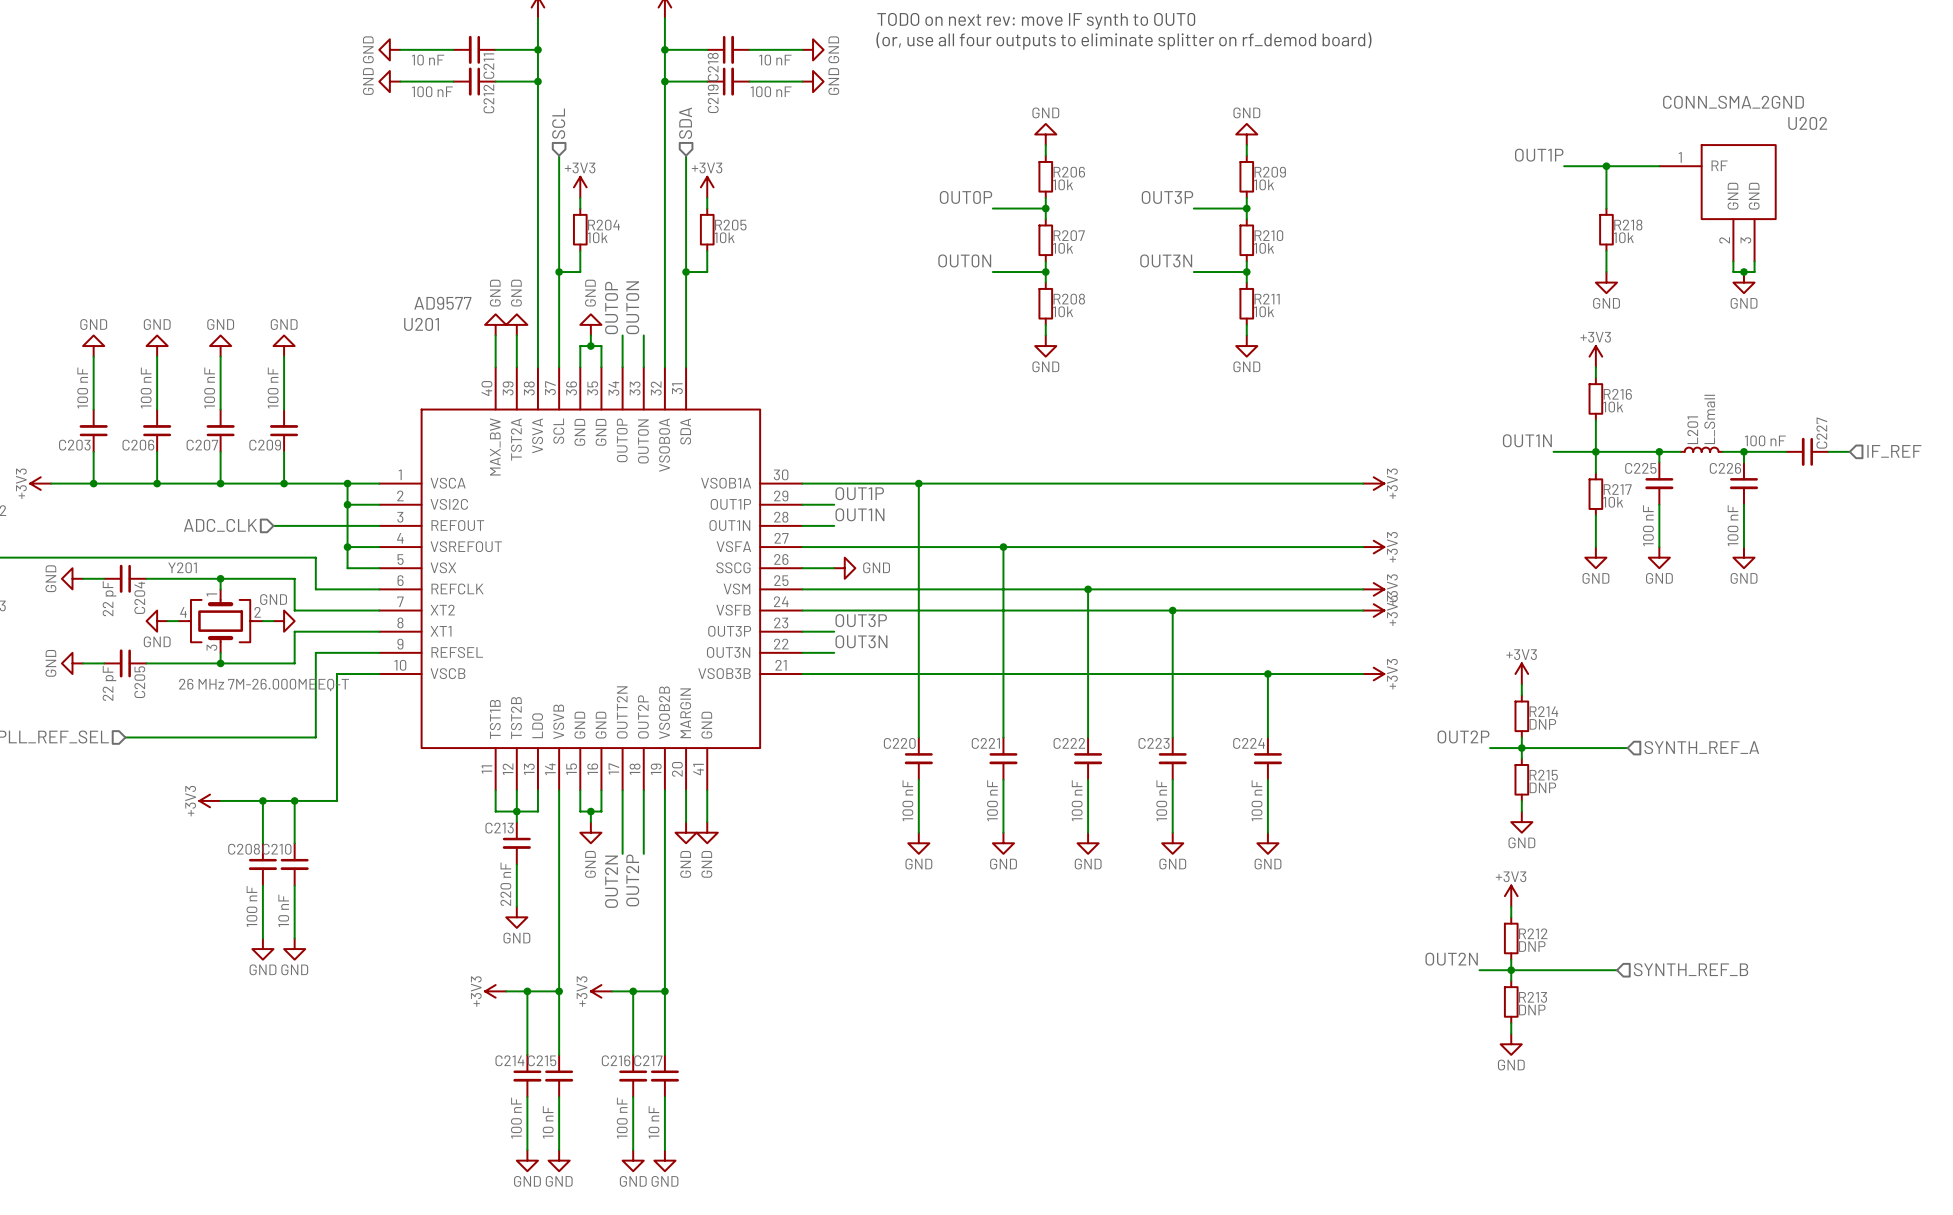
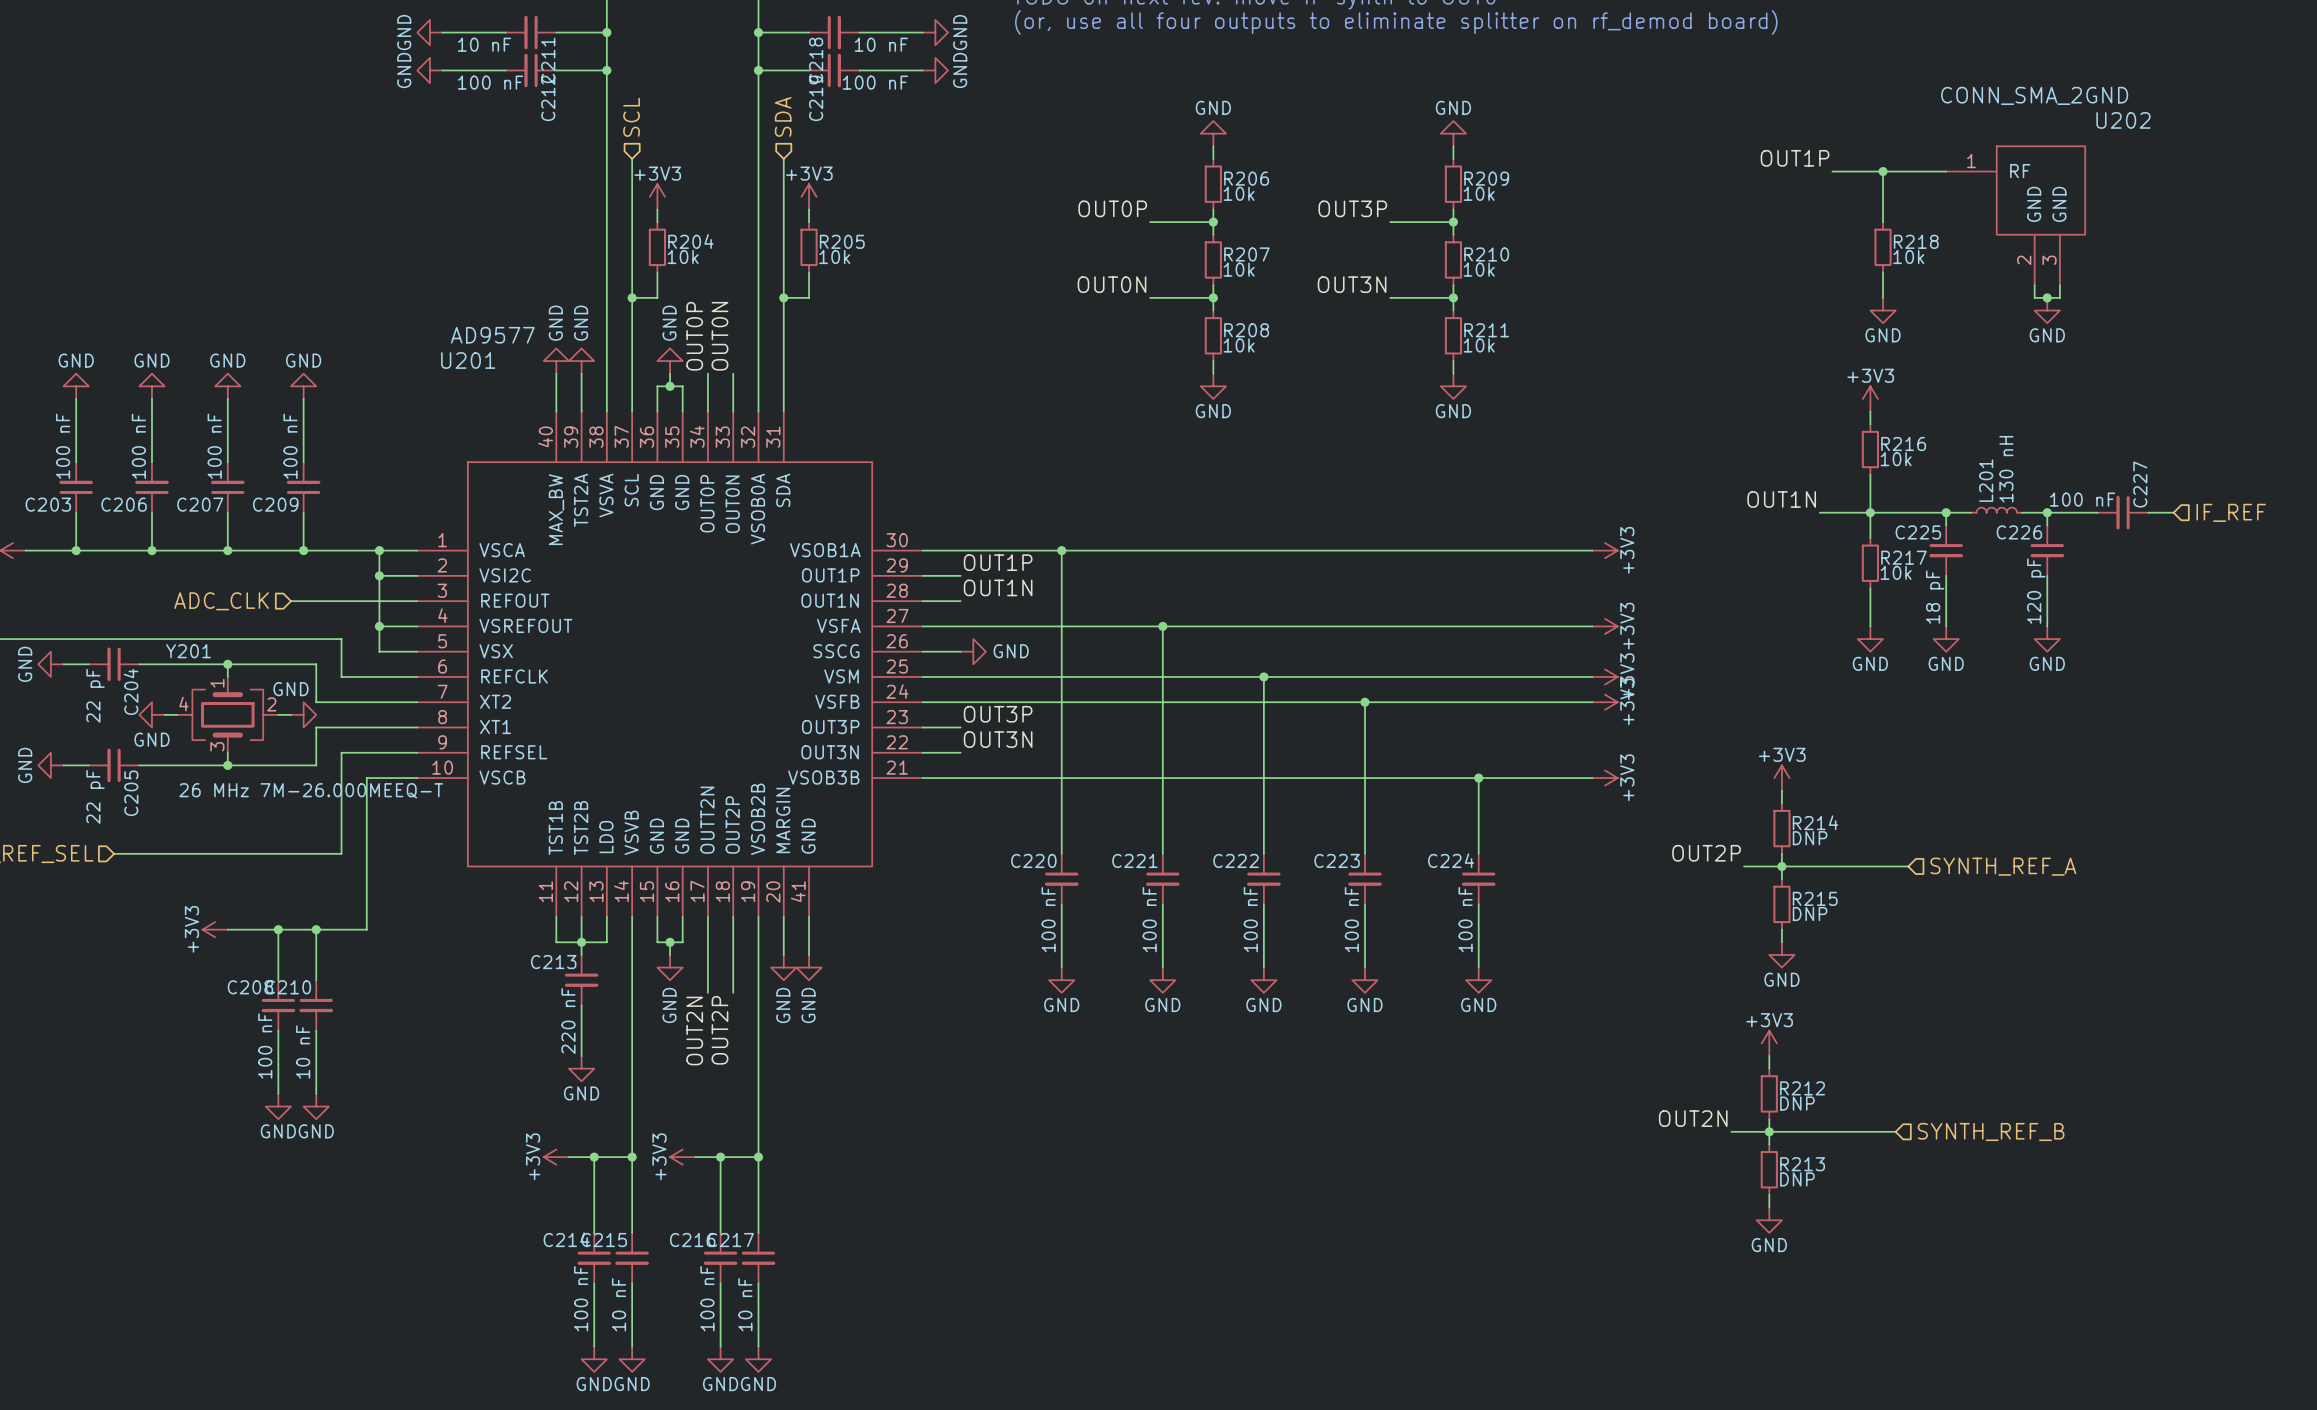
L201 value: L_Small (1709, 419) -> 130 nH (2006, 469)
C225 value: 100 nF (1648, 525) -> 18 pF (1935, 597)
C226 value: 100 nF (1733, 525) -> 120 pF (2036, 591)

